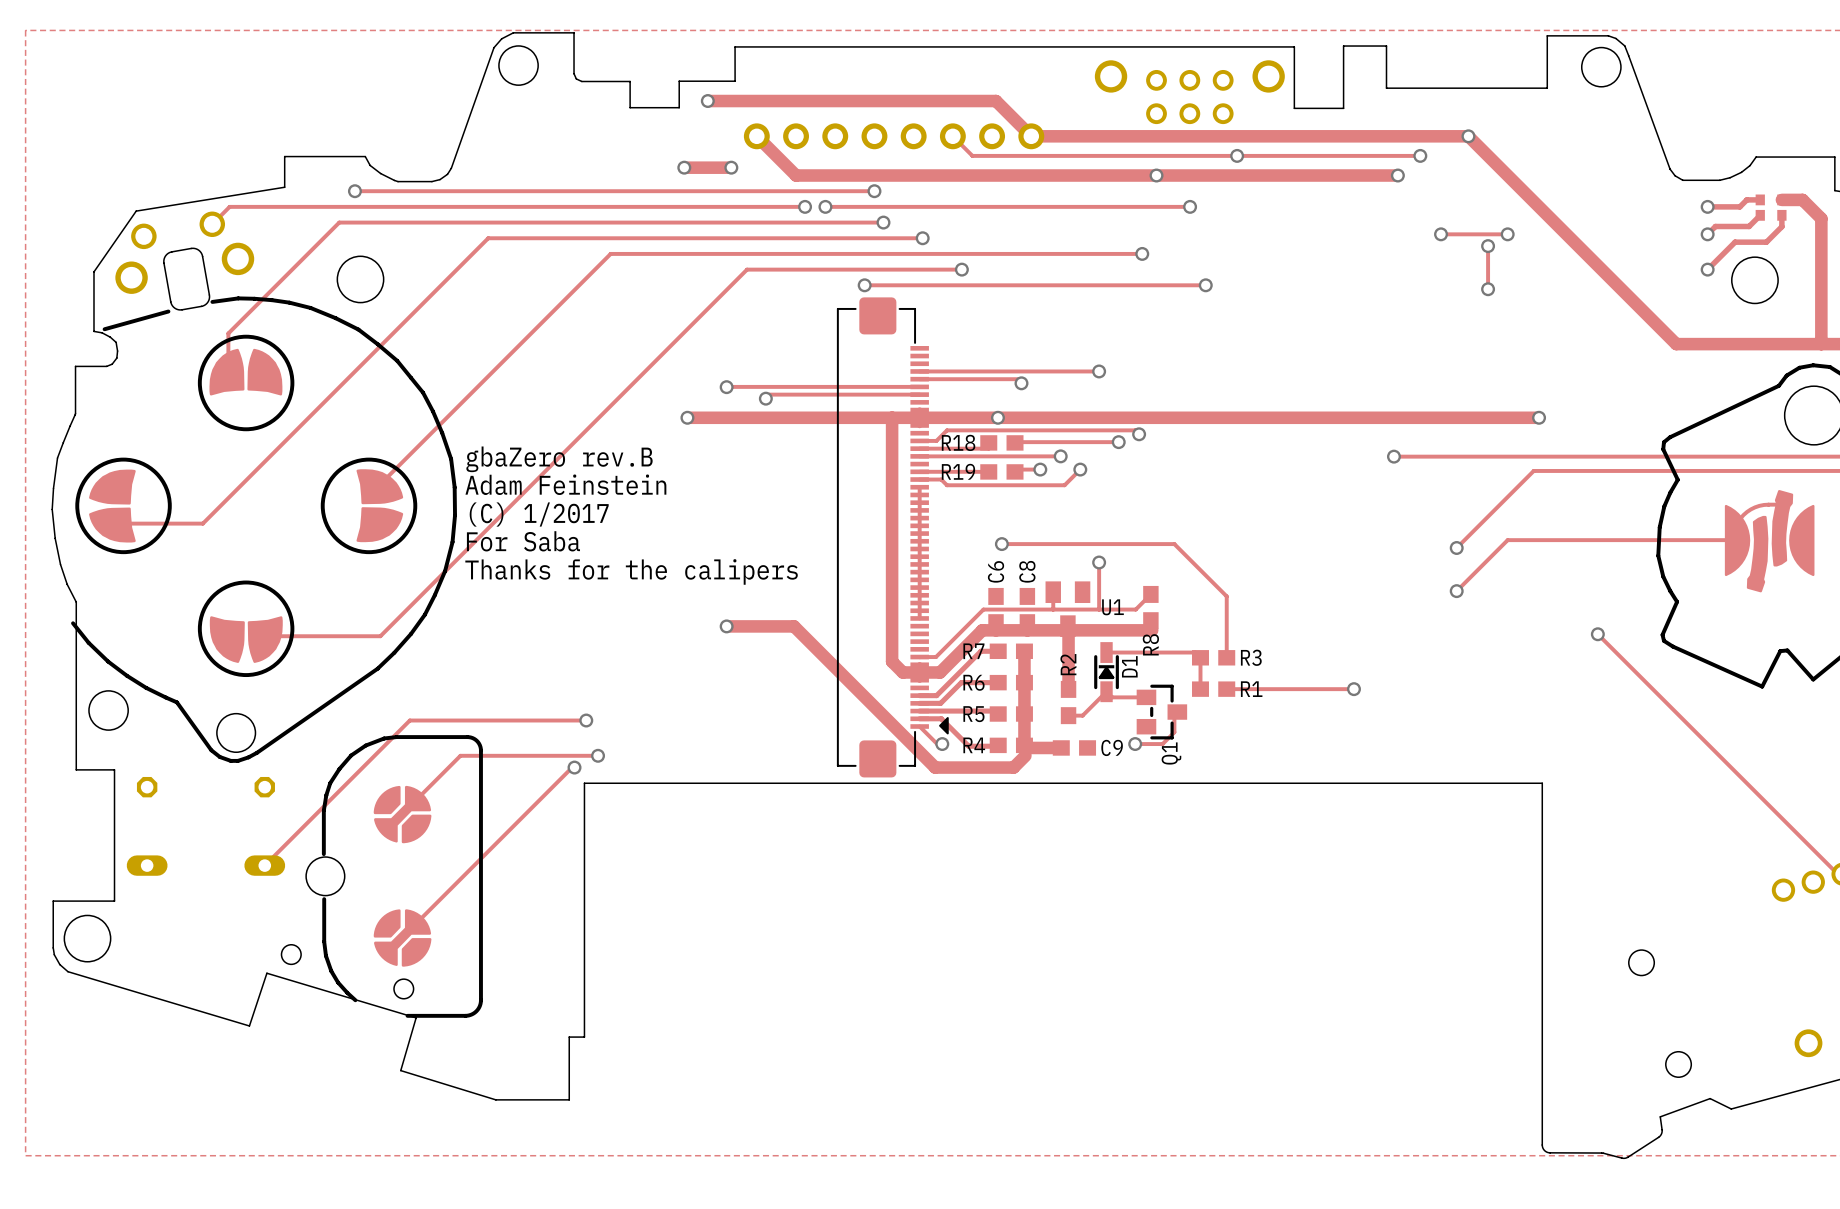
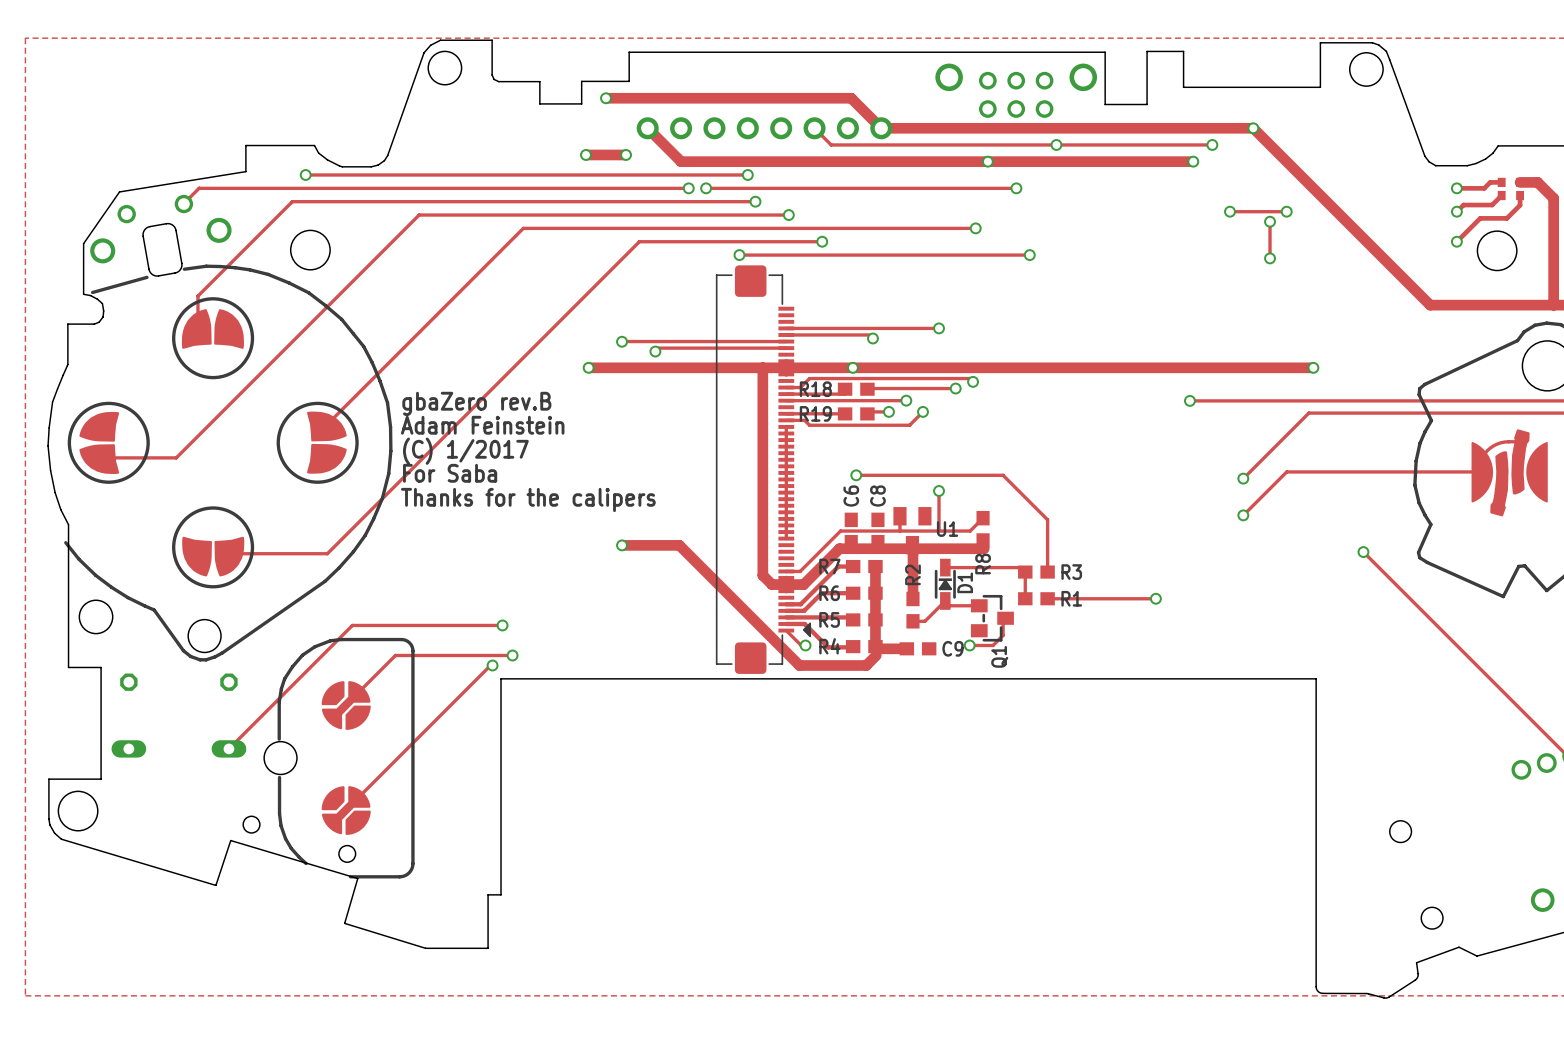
part footprint: [115, 211, 255, 310] -> [90, 194, 232, 277]

